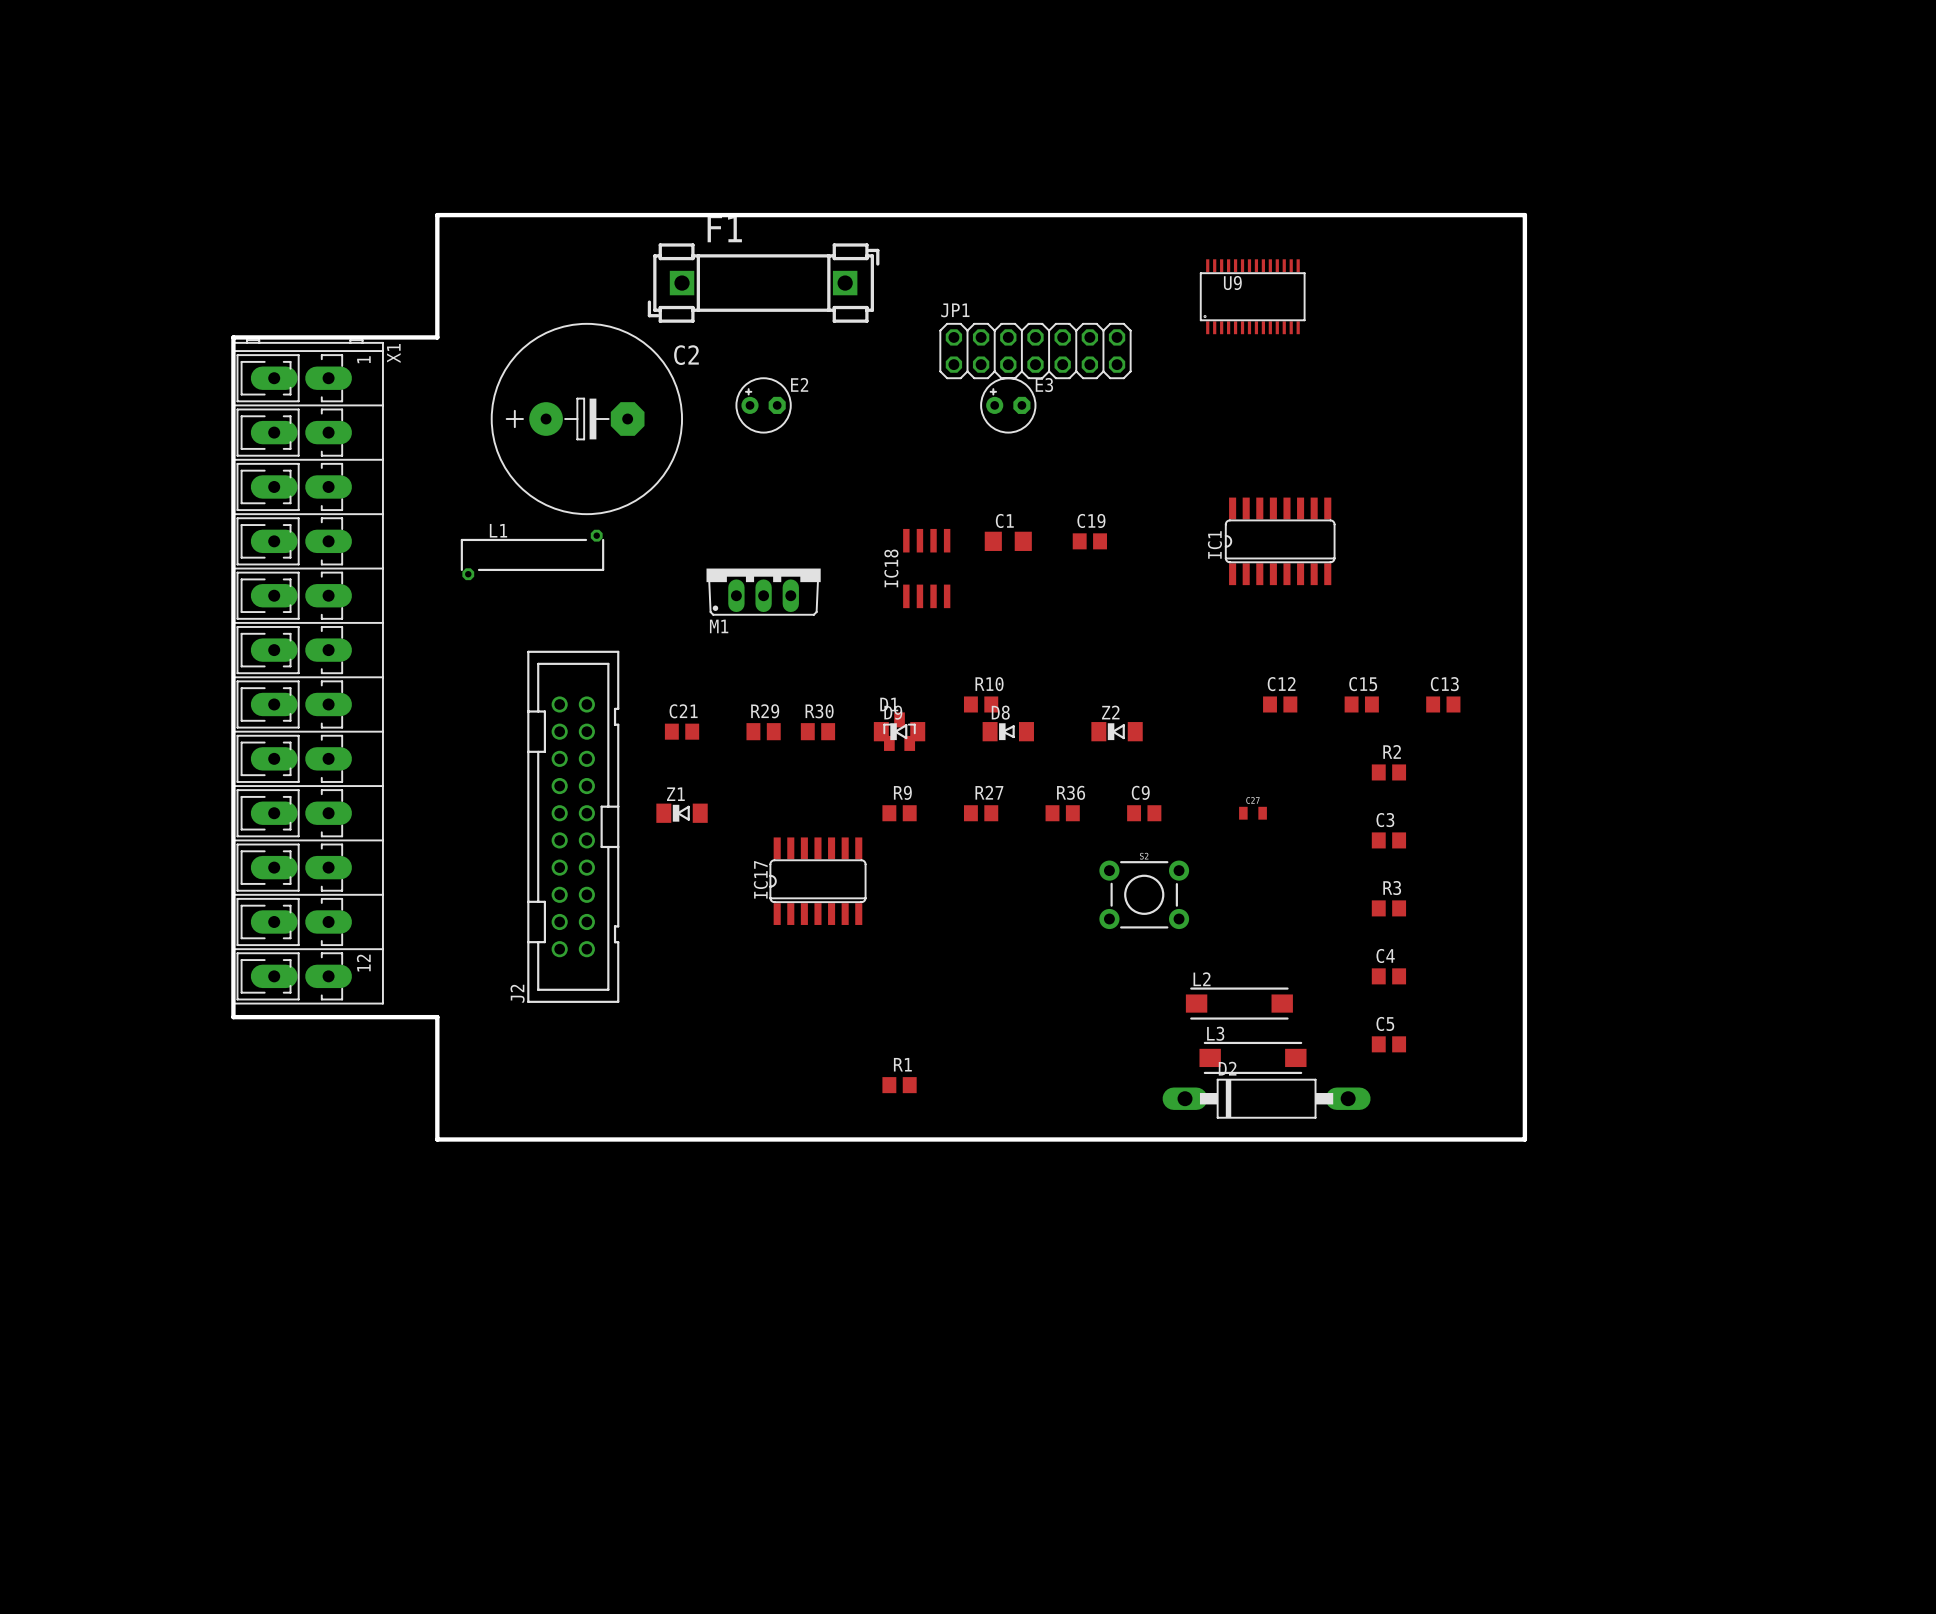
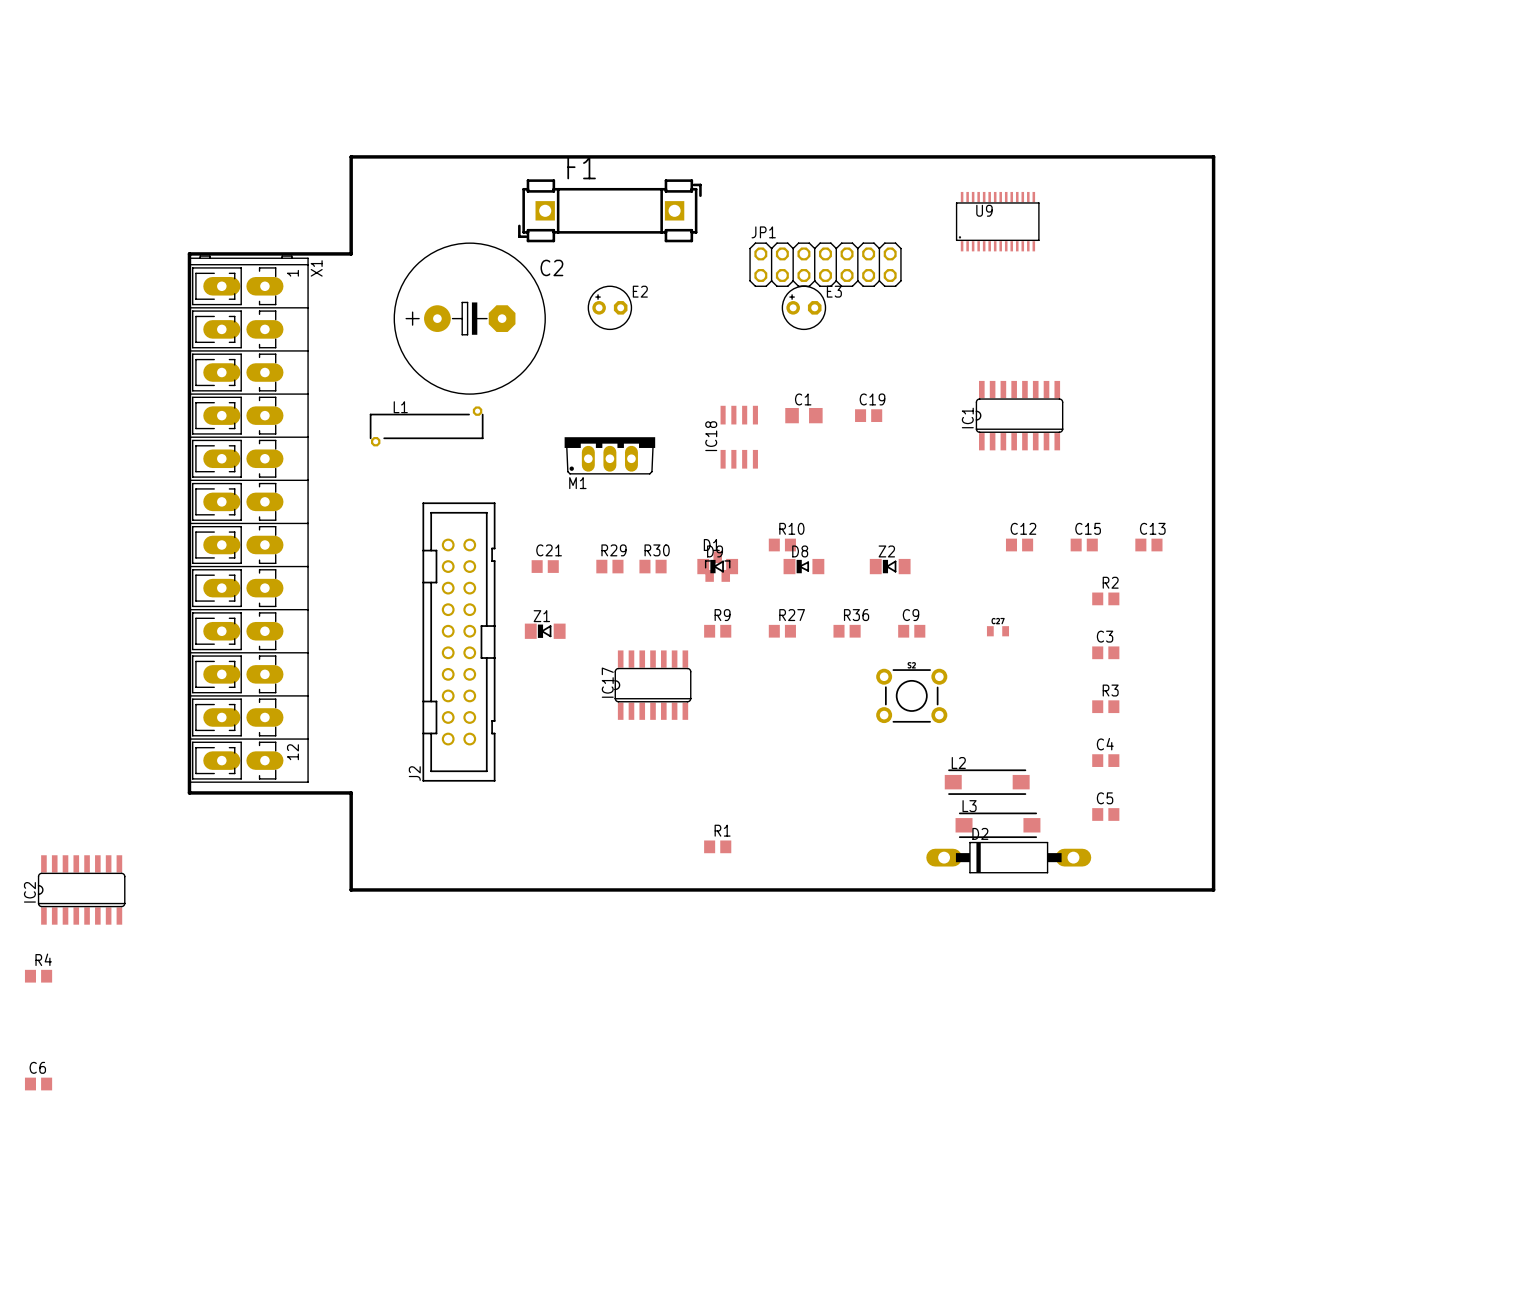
IC2: none -> (81, 889)
R4: none -> (38, 976)
C6: none -> (38, 1084)

